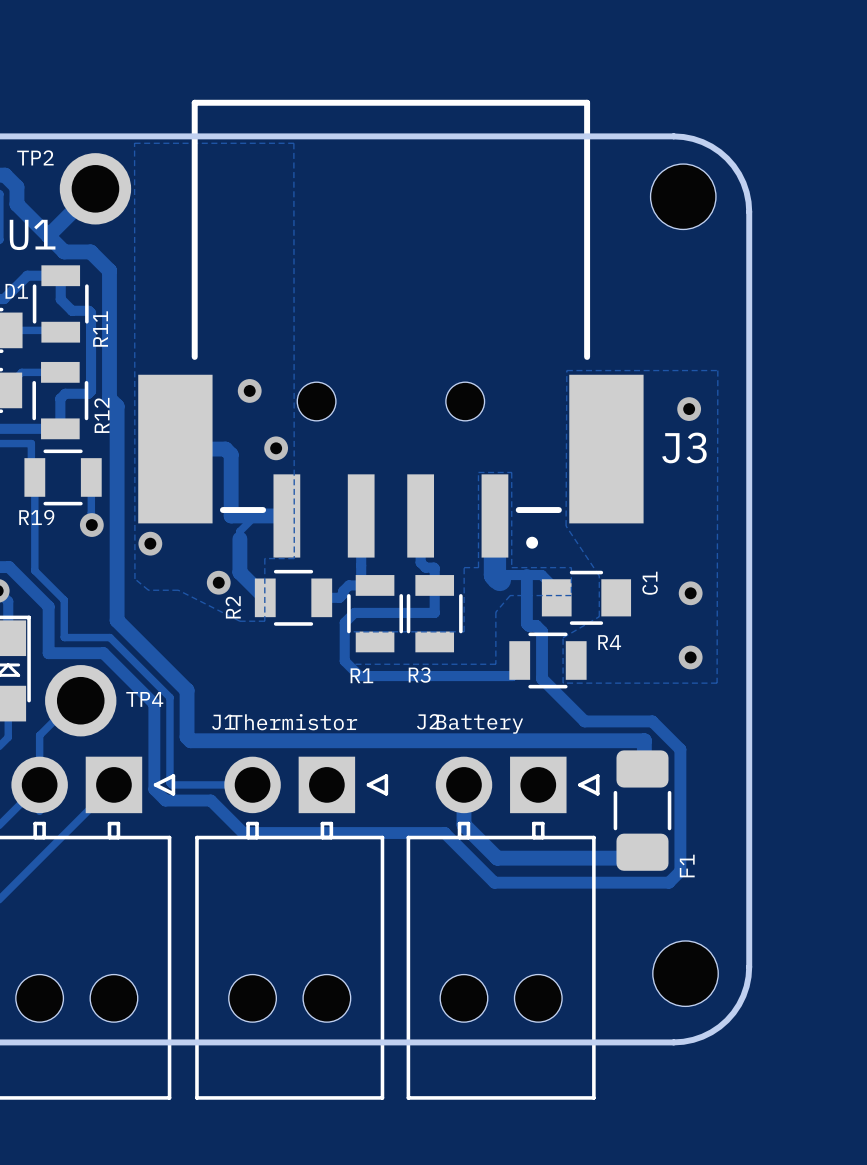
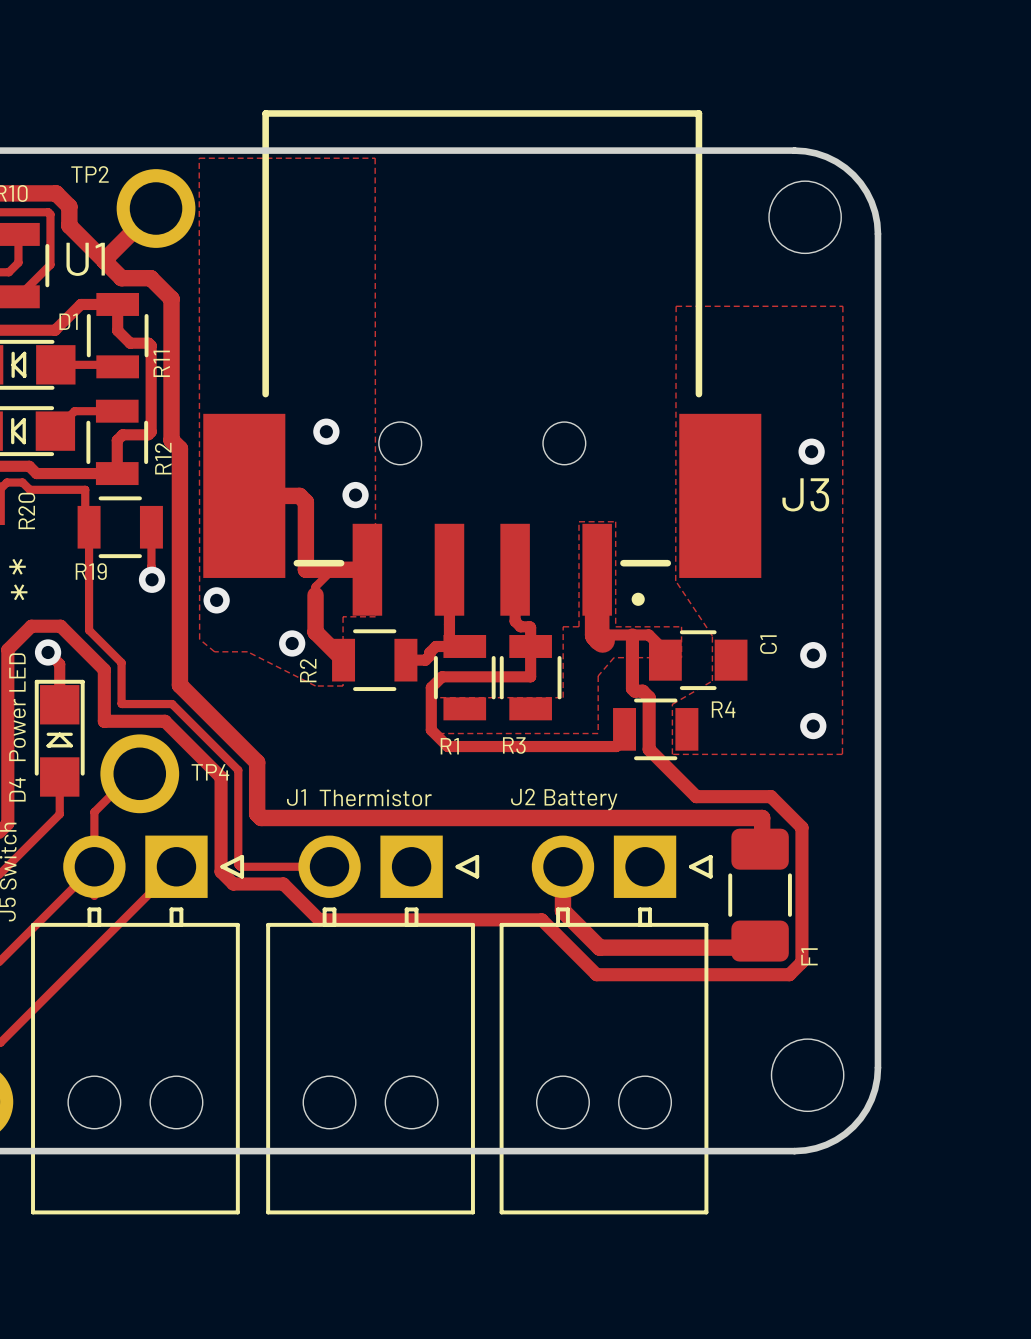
zone outline: (566, 526) (566, 370) (717, 370) (717, 683) -> (675, 580) (676, 306) (842, 306) (842, 754)

